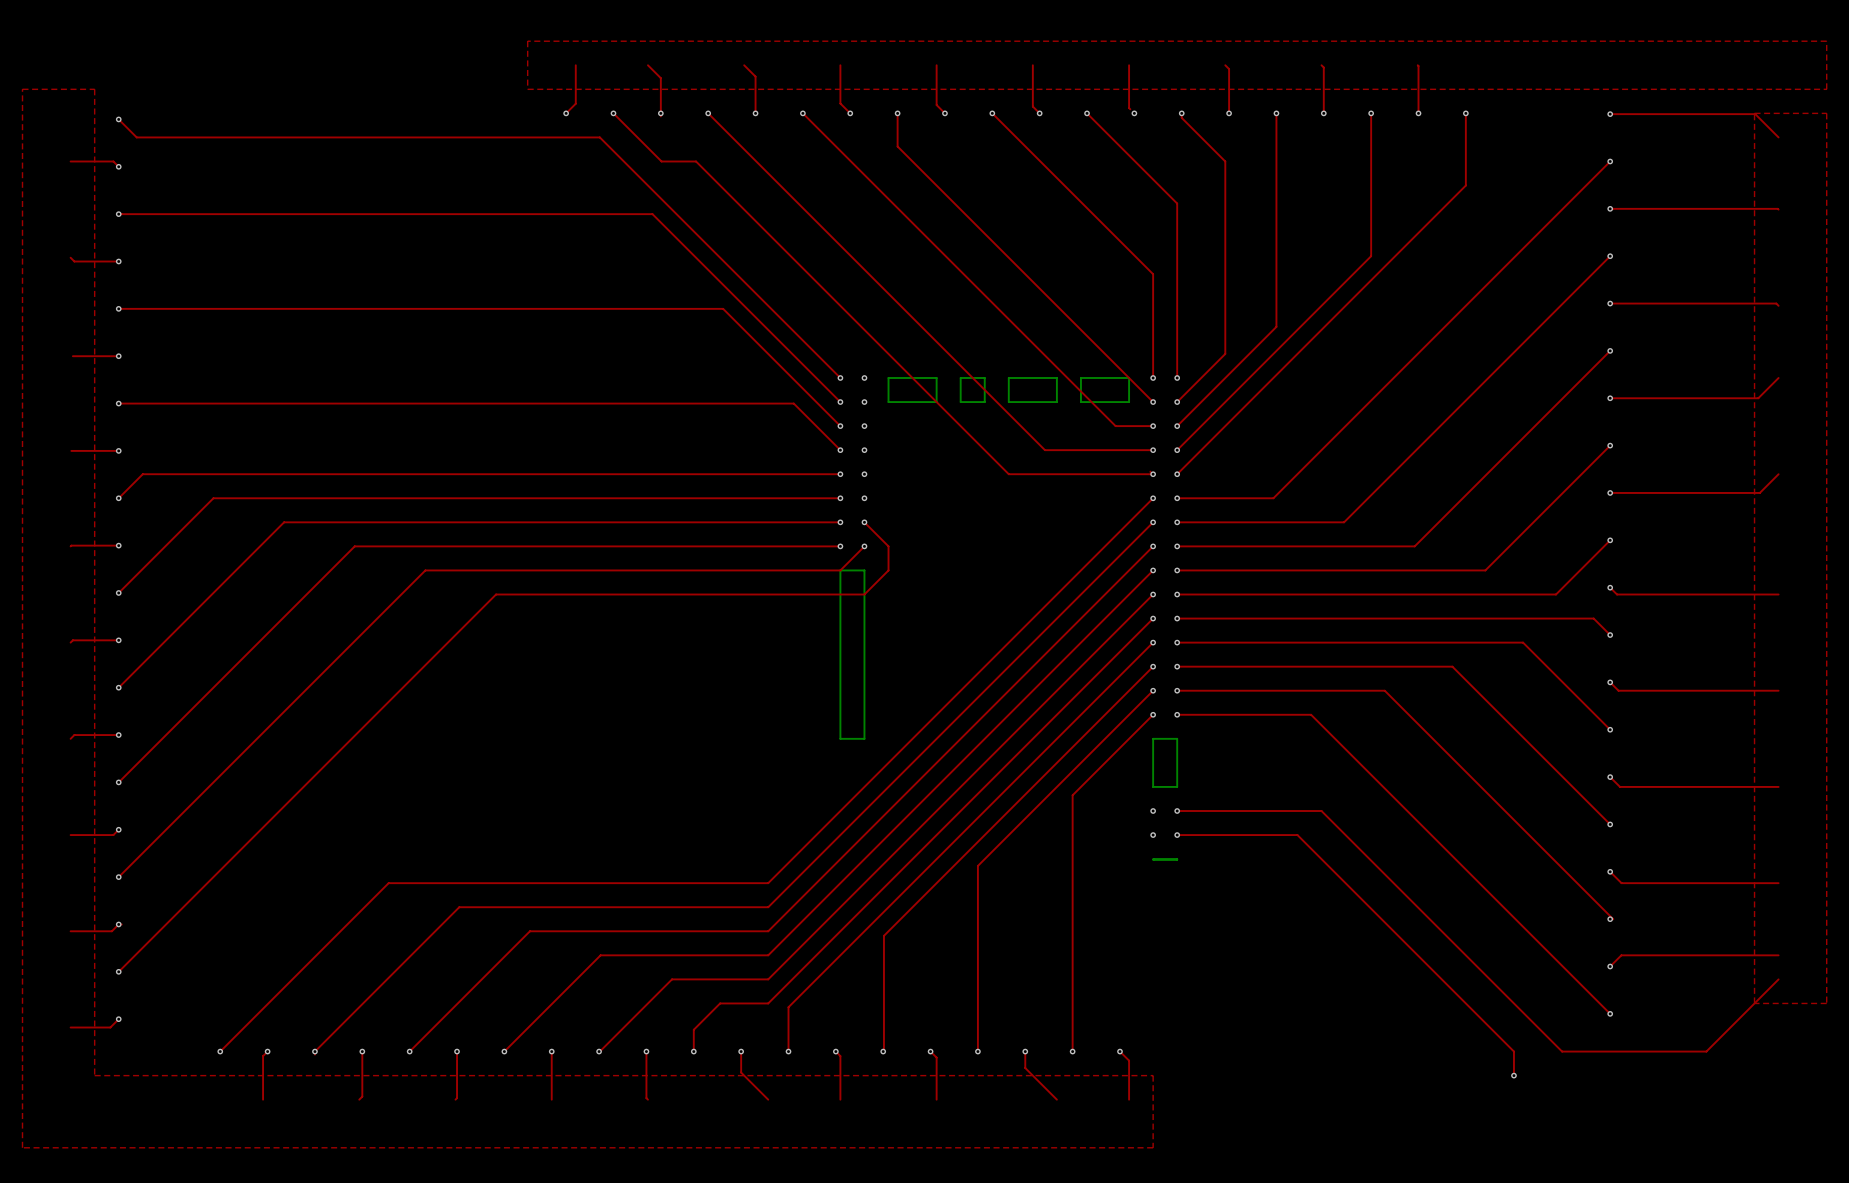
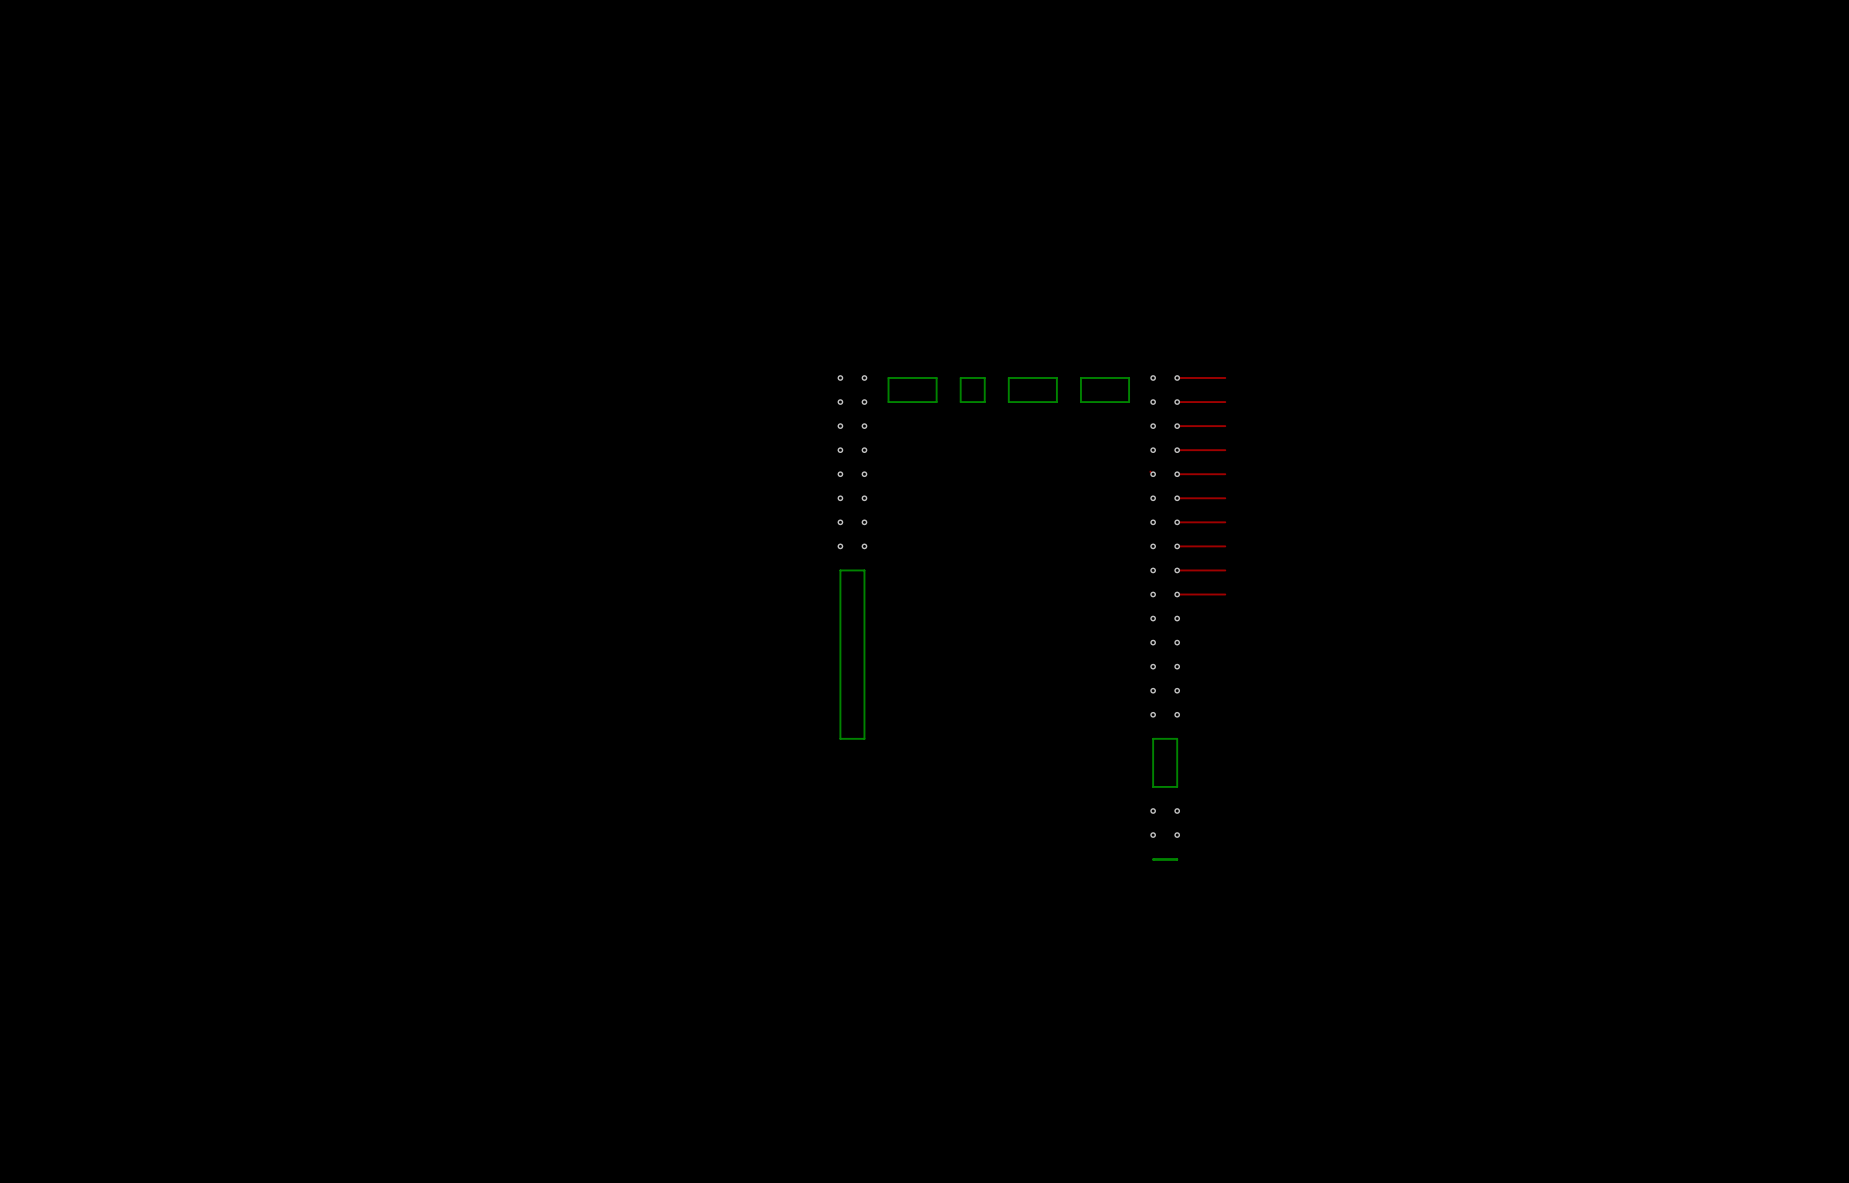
top zone outline: (527, 41) (1826, 41) (1826, 89) (527, 89) (527, 41) -> none
top track: (575, 65) (575, 103) (566, 113) -> none
top track: (647, 65) (660, 78) (660, 116) -> none
top track: (744, 65) (755, 76) (755, 113) -> none
top track: (840, 65) (840, 103) (850, 113) -> none
top track: (936, 65) (936, 105) (944, 113) -> none
top track: (1032, 65) (1032, 106) (1039, 113) -> none
top track: (1129, 65) (1130, 109) -> none
top track: (1225, 65) (1229, 69) (1229, 114) -> none
top track: (1321, 65) (1323, 67) (1323, 113) -> none
top track: (1417, 65) (1418, 113) -> none
top zone outline: (22, 89) (94, 89) (94, 1075) (1153, 1075) (1153, 1147) (22, 1147) (22, 89) -> none
via: (566, 113) -> none
top track: (613, 113) (661, 161) (696, 161) (1008, 474) (1153, 474) -> none
via: (613, 113) -> none
via: (660, 113) -> none
top track: (708, 113) (1044, 450) (1153, 450) -> none
via: (708, 113) -> none
via: (755, 113) -> none
via: (802, 113) -> none
via: (850, 113) -> none
top track: (897, 113) (897, 146) (1153, 402) -> none
via: (897, 113) -> none
via: (944, 113) -> none
top track: (992, 113) (1153, 274) (1153, 377) -> none
via: (992, 113) -> none
via: (1039, 113) -> none
top track: (1087, 113) (1177, 203) (1177, 377) -> (1225, 377) (1177, 377)
via: (1087, 113) -> none
via: (1134, 113) -> none
top track: (1181, 113) (1181, 117) (1225, 161) (1225, 353) (1177, 402) -> (1225, 402) (1177, 402)
via: (1181, 113) -> none
via: (1229, 113) -> none
top track: (1276, 113) (1276, 326) (1177, 426) -> (1225, 426) (1177, 426)
via: (1276, 113) -> none
via: (1323, 113) -> none
top track: (1371, 113) (1371, 256) (1177, 450) -> (1225, 450) (1177, 450)
via: (1371, 113) -> none
via: (1418, 113) -> none
top track: (1465, 113) (1465, 185) (1177, 474) -> (1225, 474) (1177, 474)
via: (1465, 113) -> none
top zone outline: (1754, 113) (1826, 113) (1826, 1003) (1754, 1003) (1754, 113) -> none
top track: (802, 114) (1115, 426) (1153, 426) -> none
top track: (1610, 114) (1755, 114) (1778, 137) -> none
via: (1610, 114) -> none
top track: (118, 119) (136, 137) (599, 137) (840, 377) -> none
via: (118, 119) -> none
top track: (70, 161) (113, 161) (118, 166) -> none
top track: (1610, 161) (1273, 498) (1225, 498) -> none
via: (1610, 161) -> none
via: (118, 166) -> none
top track: (1610, 208) (1778, 209) -> none
via: (1610, 208) -> none
top track: (118, 214) (652, 214) (840, 402) -> none
via: (118, 214) -> none
top track: (1610, 256) (1344, 522) (1225, 522) -> none
via: (1610, 256) -> none
top track: (70, 257) (74, 261) (118, 261) -> none
via: (118, 261) -> none
top track: (1610, 303) (1776, 303) (1778, 305) -> none
via: (1610, 303) -> none
top track: (118, 308) (723, 308) (840, 426) -> none
via: (118, 308) -> none
top track: (1610, 350) (1414, 546) (1225, 546) -> none
via: (1610, 350) -> none
top track: (119, 355) (72, 356) -> none
via: (118, 356) -> none
top track: (1778, 377) (1758, 398) (1610, 398) -> none
via: (1610, 398) -> none
top track: (118, 403) (793, 403) (840, 450) -> none
via: (118, 403) -> none
top track: (1610, 445) (1485, 570) (1225, 570) -> none
via: (1610, 445) -> none
top track: (71, 450) (118, 450) -> none
via: (118, 450) -> none
top track: (840, 474) (142, 474) (118, 498) -> none
top track: (1778, 474) (1759, 492) (1610, 492) -> none
via: (1610, 492) -> none
via: (118, 498) -> none
top track: (840, 498) (213, 498) (118, 592) -> none
top track: (1153, 498) (768, 883) (388, 883) (220, 1051) -> none
top track: (840, 522) (284, 522) (118, 687) -> none
top track: (864, 522) (888, 546) (888, 570) (864, 594) (496, 594) (118, 971) -> none
top track: (1153, 522) (768, 907) (459, 907) (314, 1051) (314, 1054) -> none
top track: (1610, 540) (1556, 594) (1225, 594) -> none
via: (1610, 540) -> none
top track: (118, 545) (70, 546) -> none
via: (118, 545) -> none
top track: (840, 546) (354, 546) (119, 783) -> none
top track: (864, 546) (840, 570) (425, 570) (118, 877) -> none
top track: (1153, 546) (768, 931) (529, 931) (409, 1051) -> none
top track: (1153, 570) (768, 955) (600, 955) (504, 1051) -> none
top track: (1610, 587) (1617, 594) (1778, 594) -> none
via: (1610, 587) -> none
via: (118, 592) -> none
top track: (1153, 594) (768, 979) (672, 979) (599, 1051) -> none
top track: (1153, 618) (768, 1003) (720, 1003) (693, 1029) (693, 1051) -> none
top track: (1177, 618) (1593, 618) (1610, 635) -> none
via: (1610, 635) -> none
top track: (118, 640) (72, 640) (70, 642) -> none
via: (118, 640) -> none
top track: (1153, 642) (788, 1007) (788, 1051) -> none
top track: (1177, 642) (1523, 642) (1610, 729) -> none
top track: (1153, 666) (883, 935) (883, 1051) -> none
top track: (1177, 666) (1452, 666) (1610, 824) -> none
top track: (1610, 682) (1618, 690) (1778, 690) -> none
via: (1610, 682) -> none
via: (118, 687) -> none
top track: (1153, 690) (977, 865) (977, 1051) -> none
top track: (1177, 690) (1384, 690) (1613, 919) (1610, 919) -> none
top track: (1153, 714) (1072, 795) (1072, 1051) -> none
top track: (1177, 714) (1311, 714) (1610, 1013) -> none
via: (1610, 729) -> none
top track: (118, 735) (74, 735) (70, 738) -> none
via: (118, 735) -> none
top track: (1610, 777) (1620, 786) (1778, 786) -> none
via: (1610, 777) -> none
via: (118, 782) -> none
top track: (1177, 811) (1321, 811) (1562, 1051) (1706, 1051) (1778, 979) -> none
via: (1610, 824) -> none
top track: (118, 829) (113, 835) (70, 835) -> none
via: (118, 829) -> none
top track: (1177, 835) (1297, 835) (1513, 1051) (1513, 1075) -> none
top track: (1610, 871) (1621, 883) (1778, 883) -> none
via: (1610, 871) -> none
via: (118, 877) -> none
via: (1610, 919) -> none
via: (118, 924) -> none
top track: (121, 924) (118, 924) (111, 931) (70, 931) -> none
top track: (1778, 955) (1621, 955) (1610, 966) -> none
via: (1610, 966) -> none
via: (118, 971) -> none
via: (1610, 1013) -> none
top track: (118, 1019) (110, 1027) (70, 1027) -> none
via: (118, 1019) -> none
via: (220, 1051) -> none
top track: (267, 1051) (263, 1056) (263, 1099) -> none
via: (267, 1051) -> none
via: (314, 1051) -> none
top track: (362, 1051) (362, 1096) (359, 1099) -> none
via: (362, 1051) -> none
via: (409, 1051) -> none
via: (457, 1051) -> none
via: (504, 1051) -> none
top track: (551, 1051) (551, 1099) -> none
via: (551, 1051) -> none
via: (599, 1051) -> none
top track: (646, 1051) (647, 1099) -> none
via: (646, 1051) -> none
via: (693, 1051) -> none
top track: (741, 1051) (741, 1072) (768, 1099) -> none
via: (741, 1051) -> none
via: (788, 1051) -> none
top track: (835, 1051) (840, 1056) (840, 1099) -> none
via: (835, 1051) -> none
via: (883, 1051) -> none
top track: (930, 1051) (936, 1057) (936, 1099) -> none
via: (930, 1051) -> none
via: (977, 1051) -> none
top track: (1025, 1051) (1025, 1068) (1056, 1099) -> none
via: (1025, 1051) -> none
via: (1072, 1051) -> none
top track: (1119, 1051) (1129, 1060) (1129, 1099) -> none
via: (1119, 1051) -> none
top track: (456, 1052) (455, 1099) -> none
via: (1513, 1075) -> none

